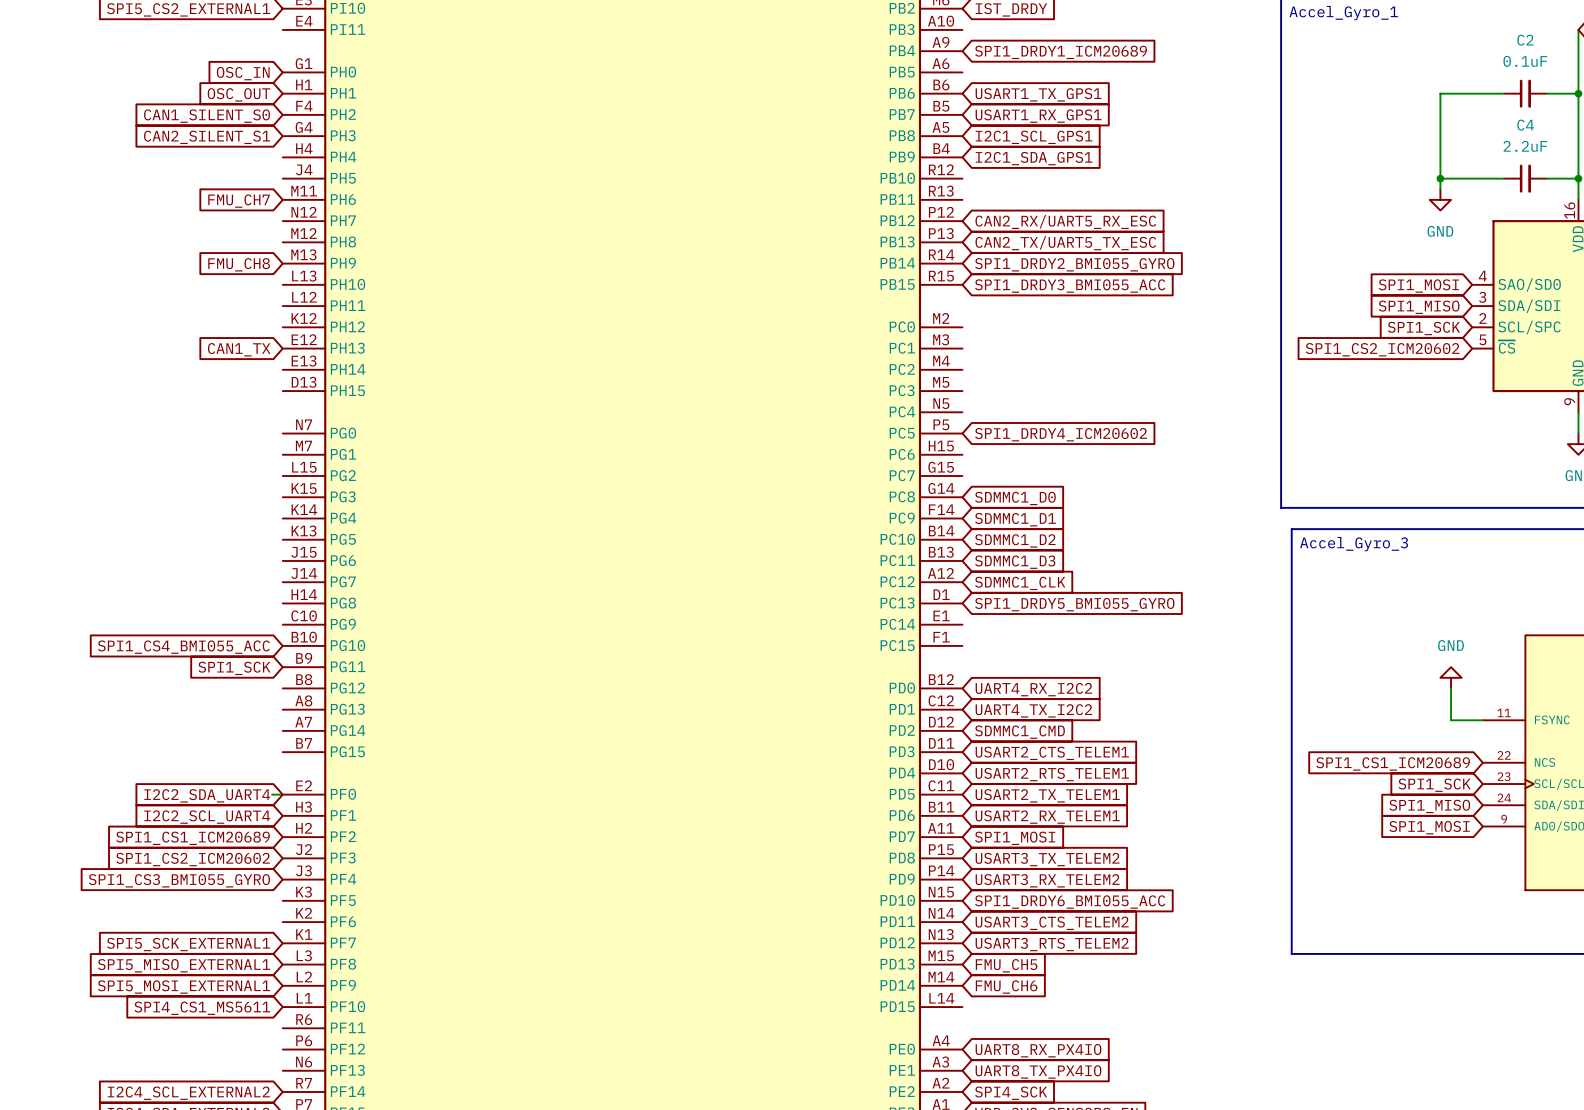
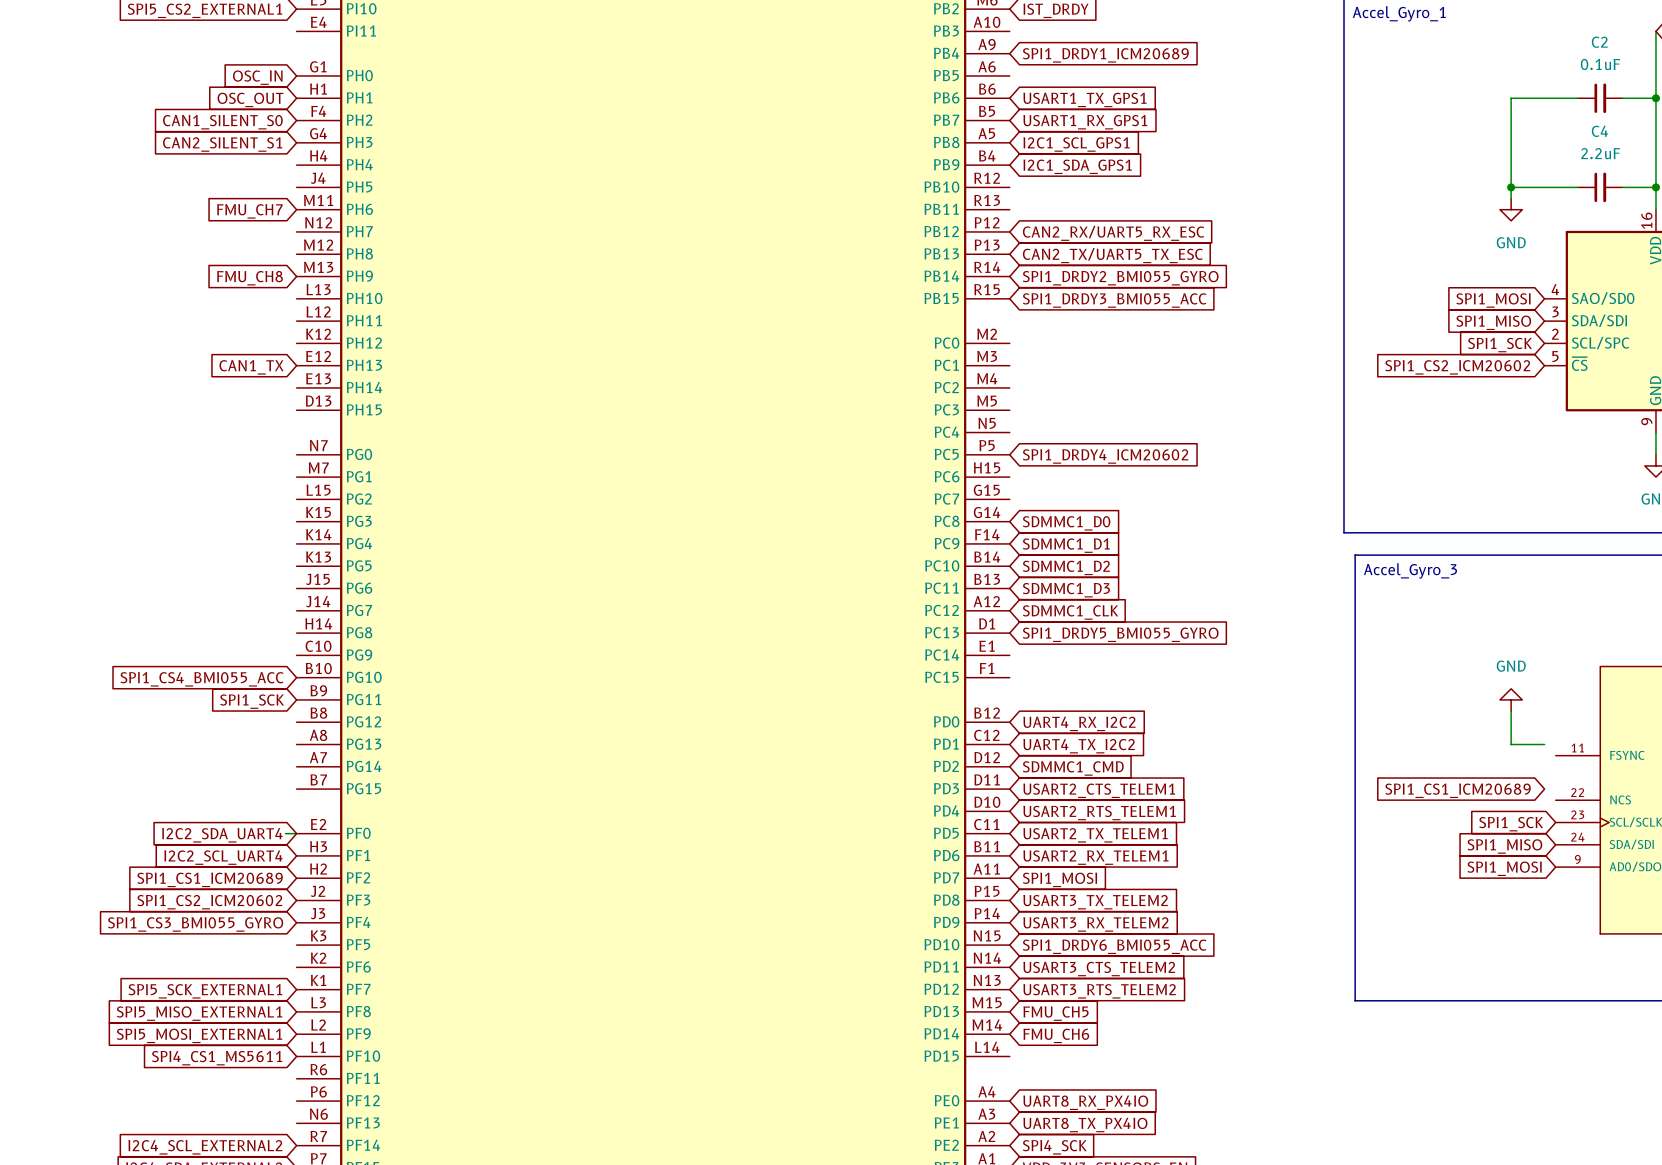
power symbol position: GND (1451, 677) -> GND (1511, 699)
wire: (1451, 688) (1451, 720) (1482, 720) -> (1511, 711) (1511, 744) (1544, 744)
global label position: SPI1_CS1_ICM20689 (1393, 763) -> SPI1_CS1_ICM20689 (1458, 790)

